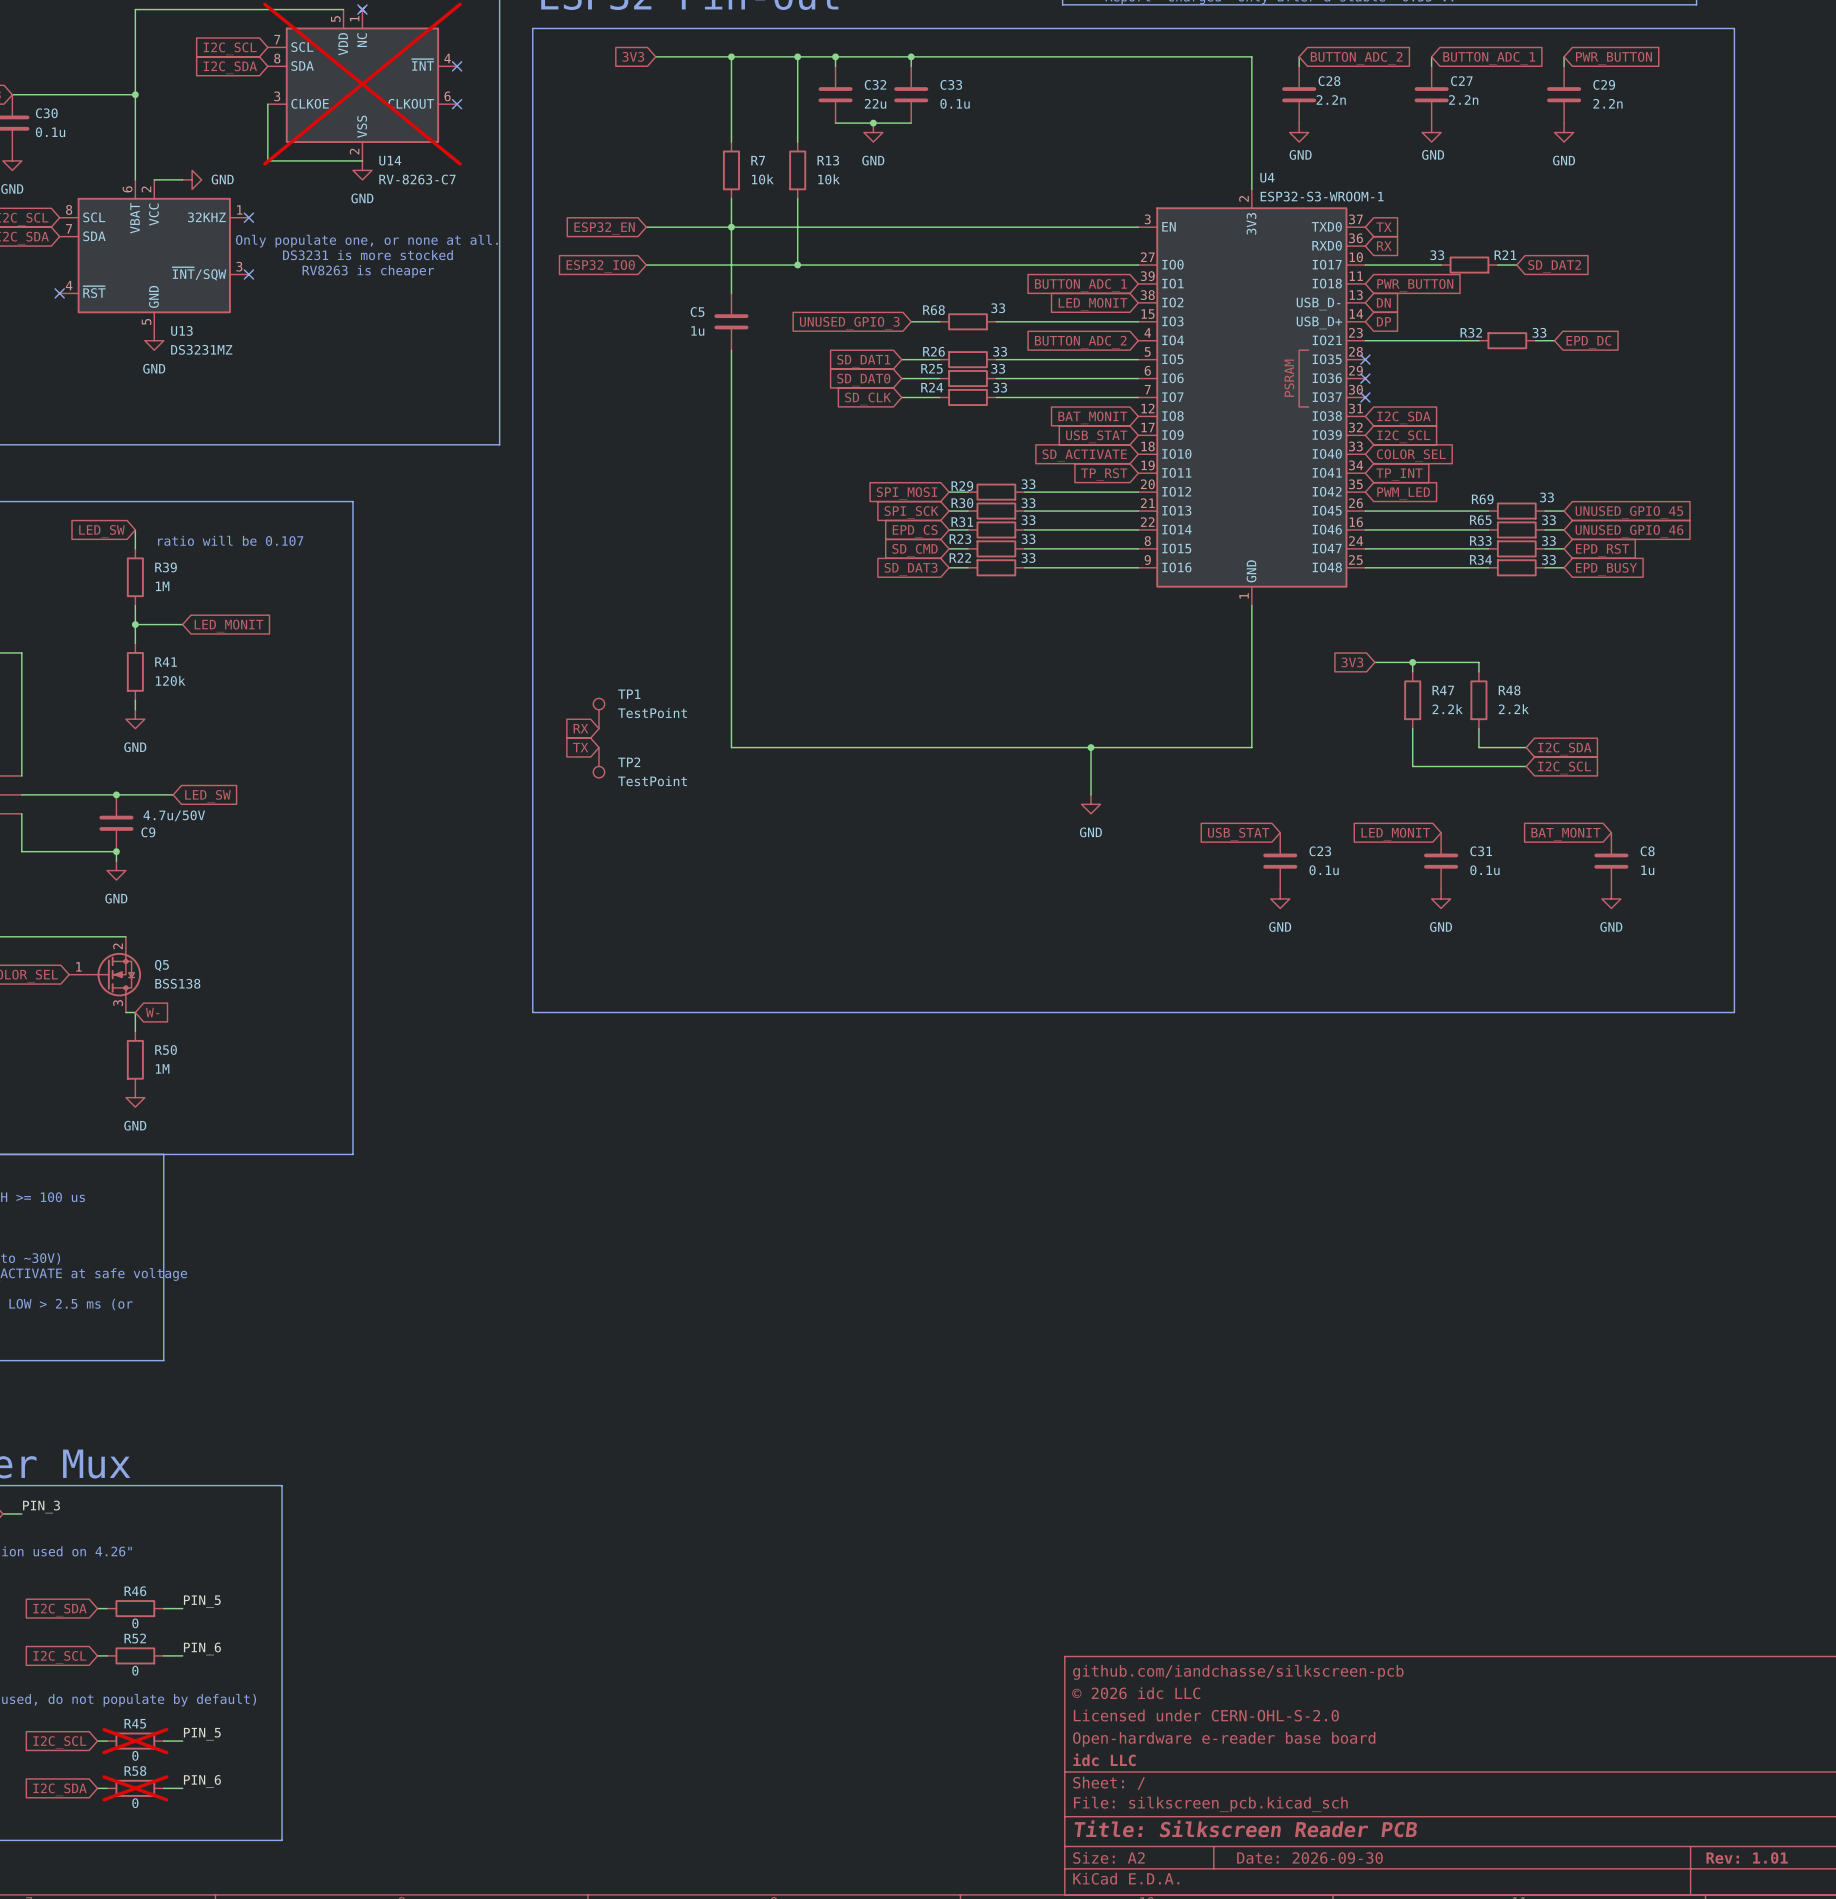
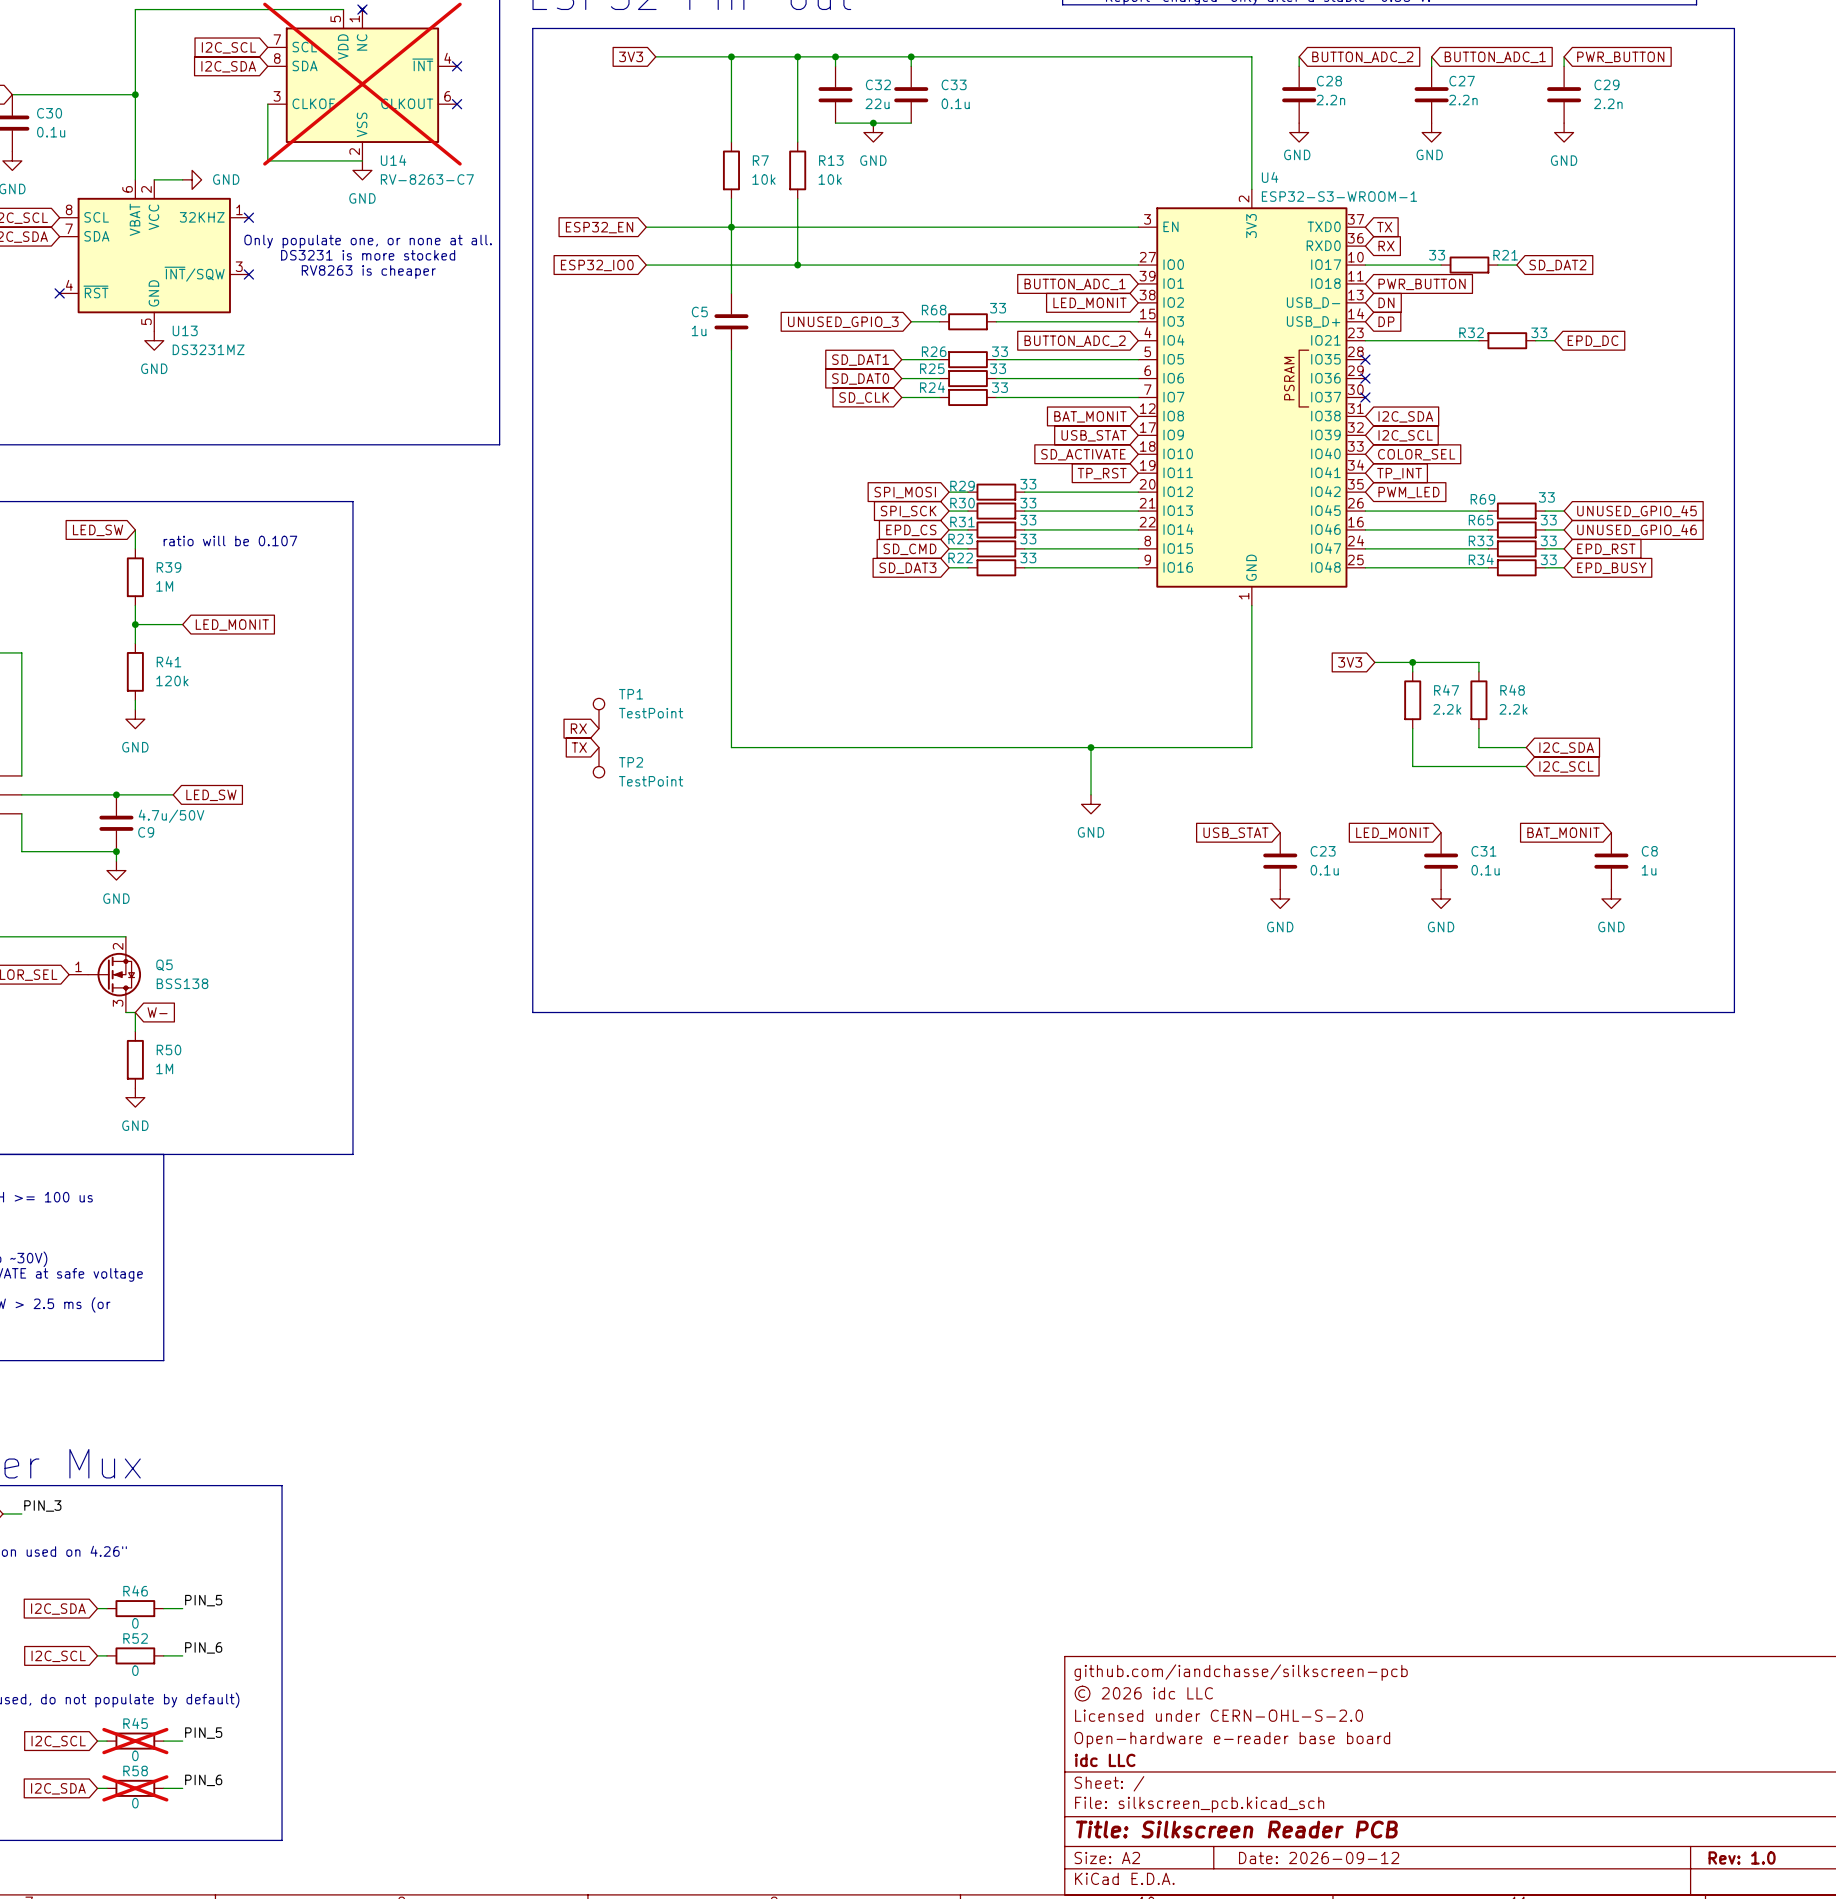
title block: Date: 2026-09-30 (1309, 1858) -> Date: 2026-09-12 (1319, 1857)
title block: Rev: 1.01 (1747, 1858) -> Rev: 1.0 (1742, 1857)

